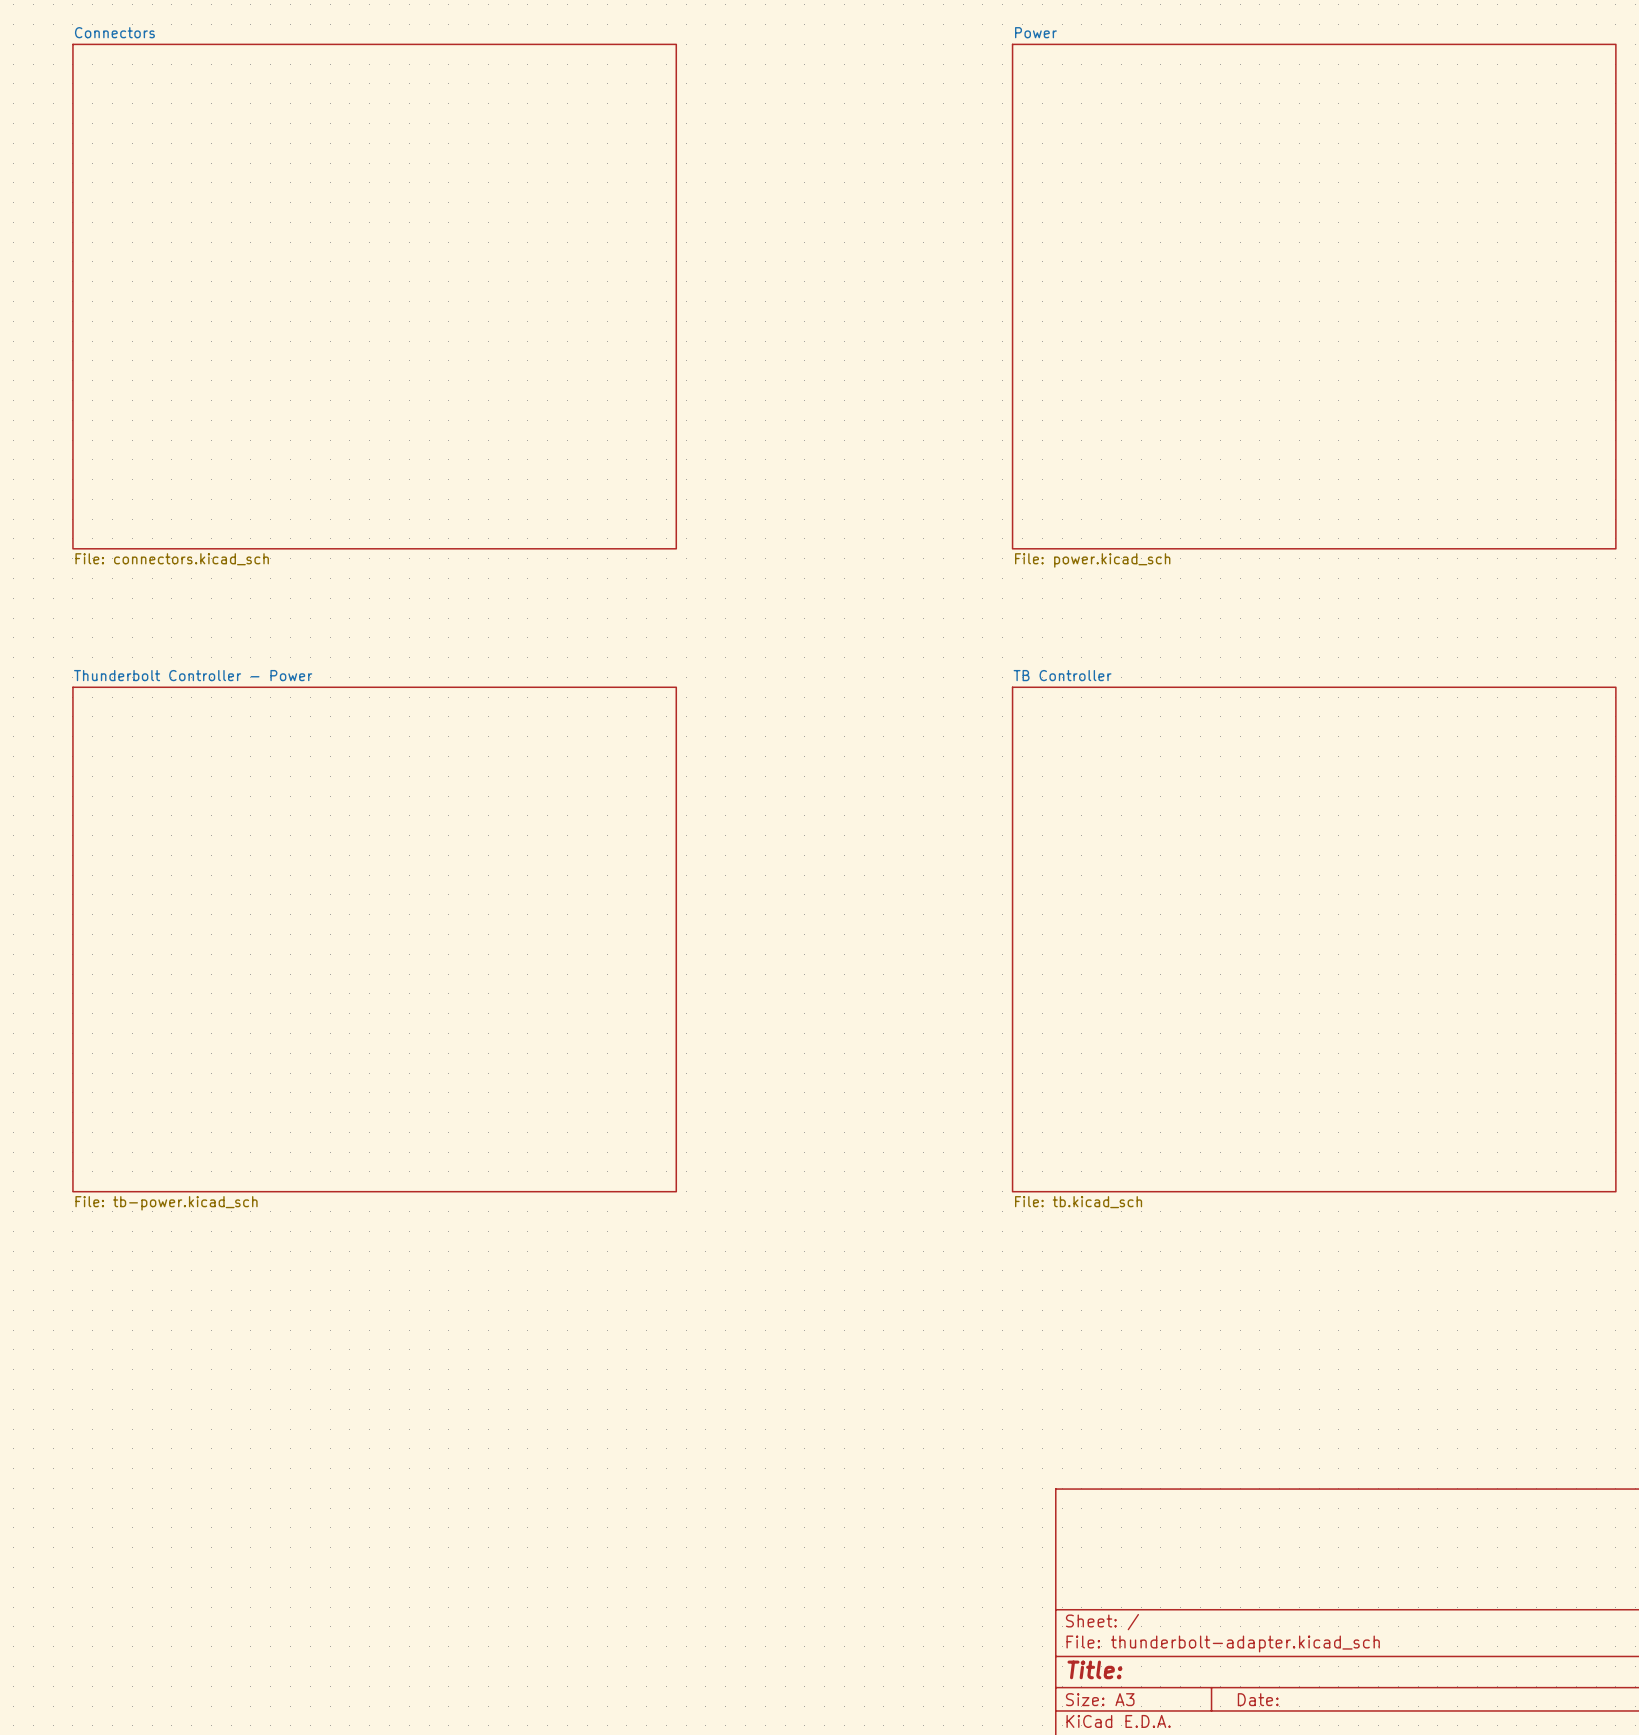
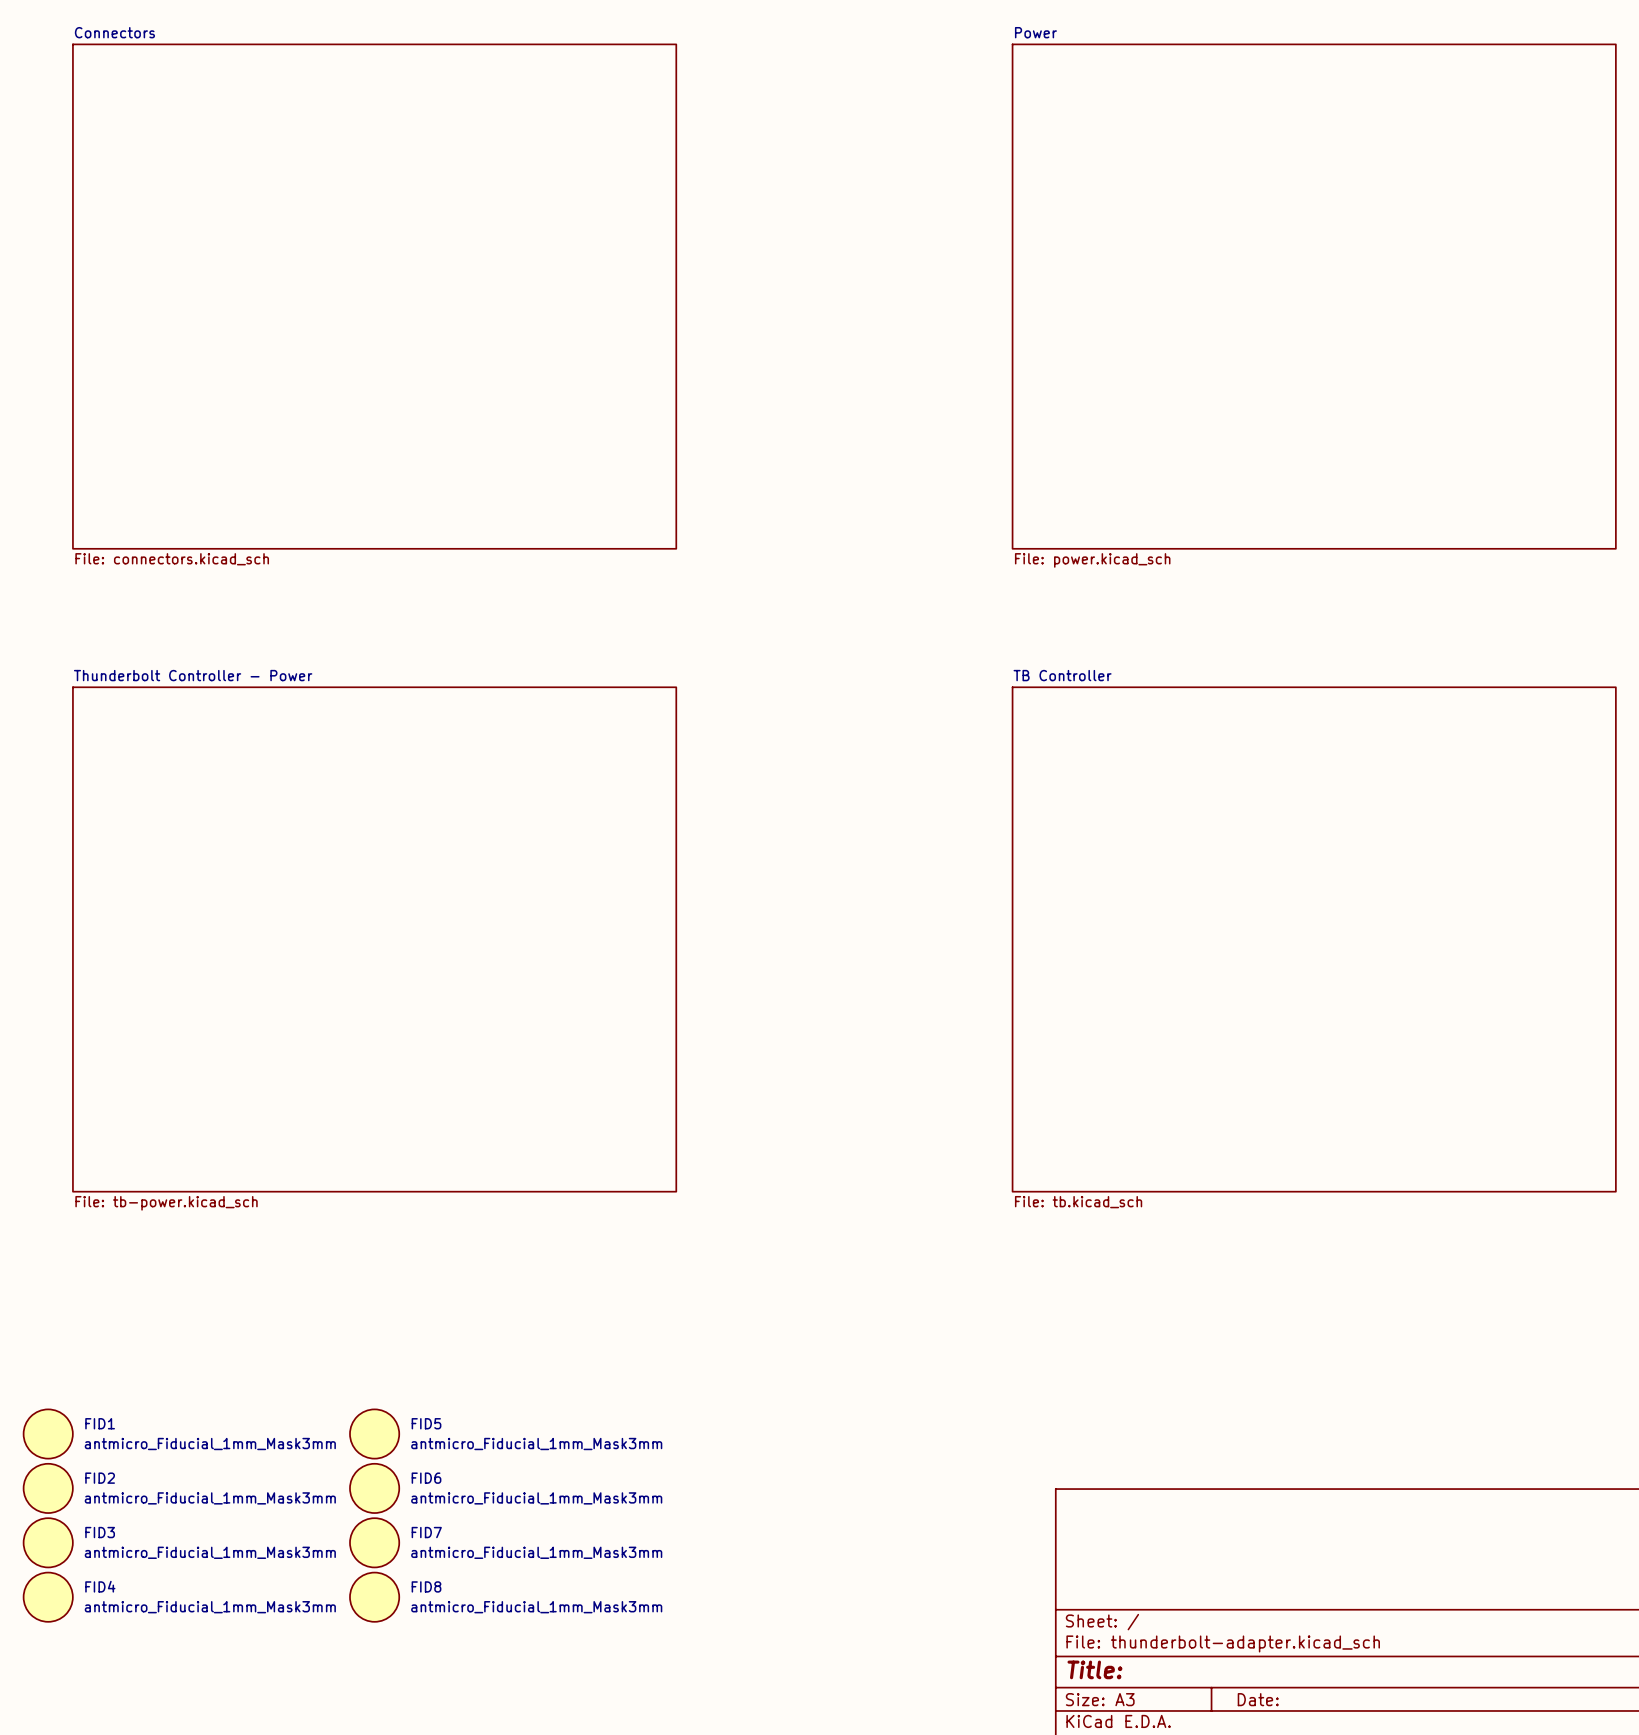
FID1: none -> antmicro_Fiducial_1mm_Mask3mm (48, 1434)
FID5: none -> antmicro_Fiducial_1mm_Mask3mm (374, 1434)
FID2: none -> antmicro_Fiducial_1mm_Mask3mm (48, 1488)
FID6: none -> antmicro_Fiducial_1mm_Mask3mm (374, 1488)
FID3: none -> antmicro_Fiducial_1mm_Mask3mm (48, 1542)
FID7: none -> antmicro_Fiducial_1mm_Mask3mm (374, 1542)
FID4: none -> antmicro_Fiducial_1mm_Mask3mm (48, 1597)
FID8: none -> antmicro_Fiducial_1mm_Mask3mm (374, 1597)

